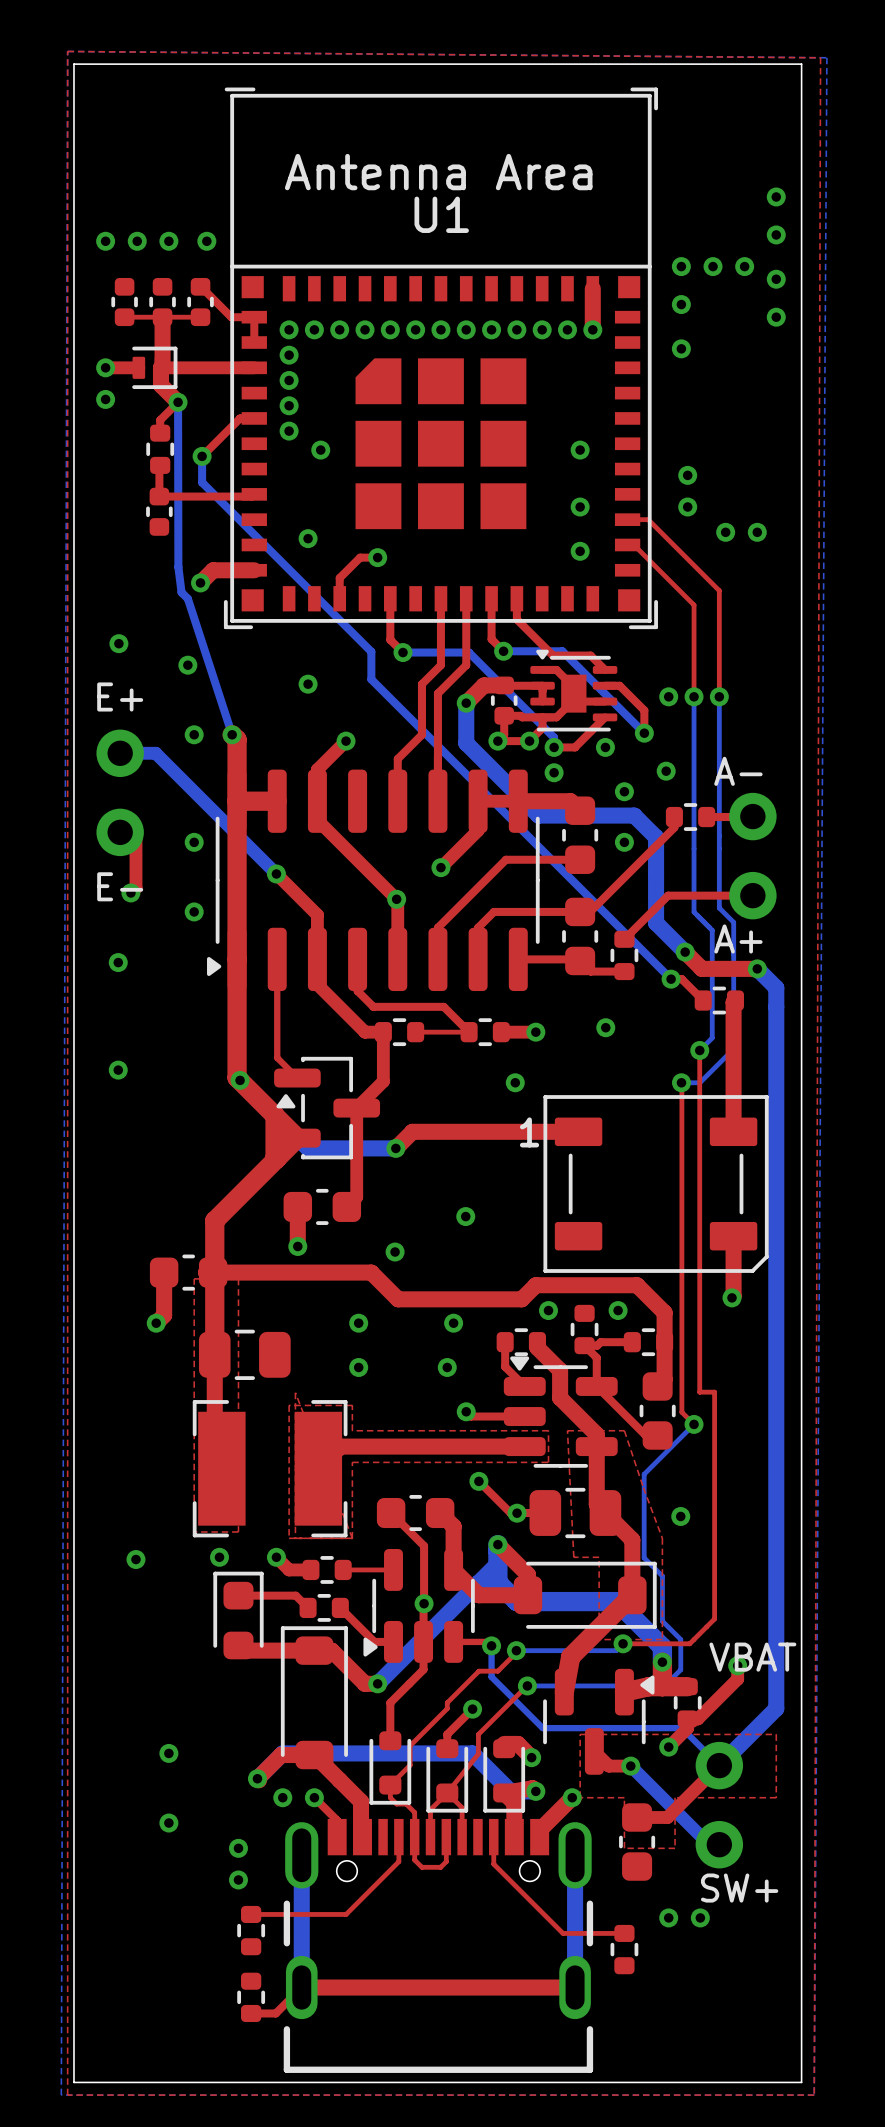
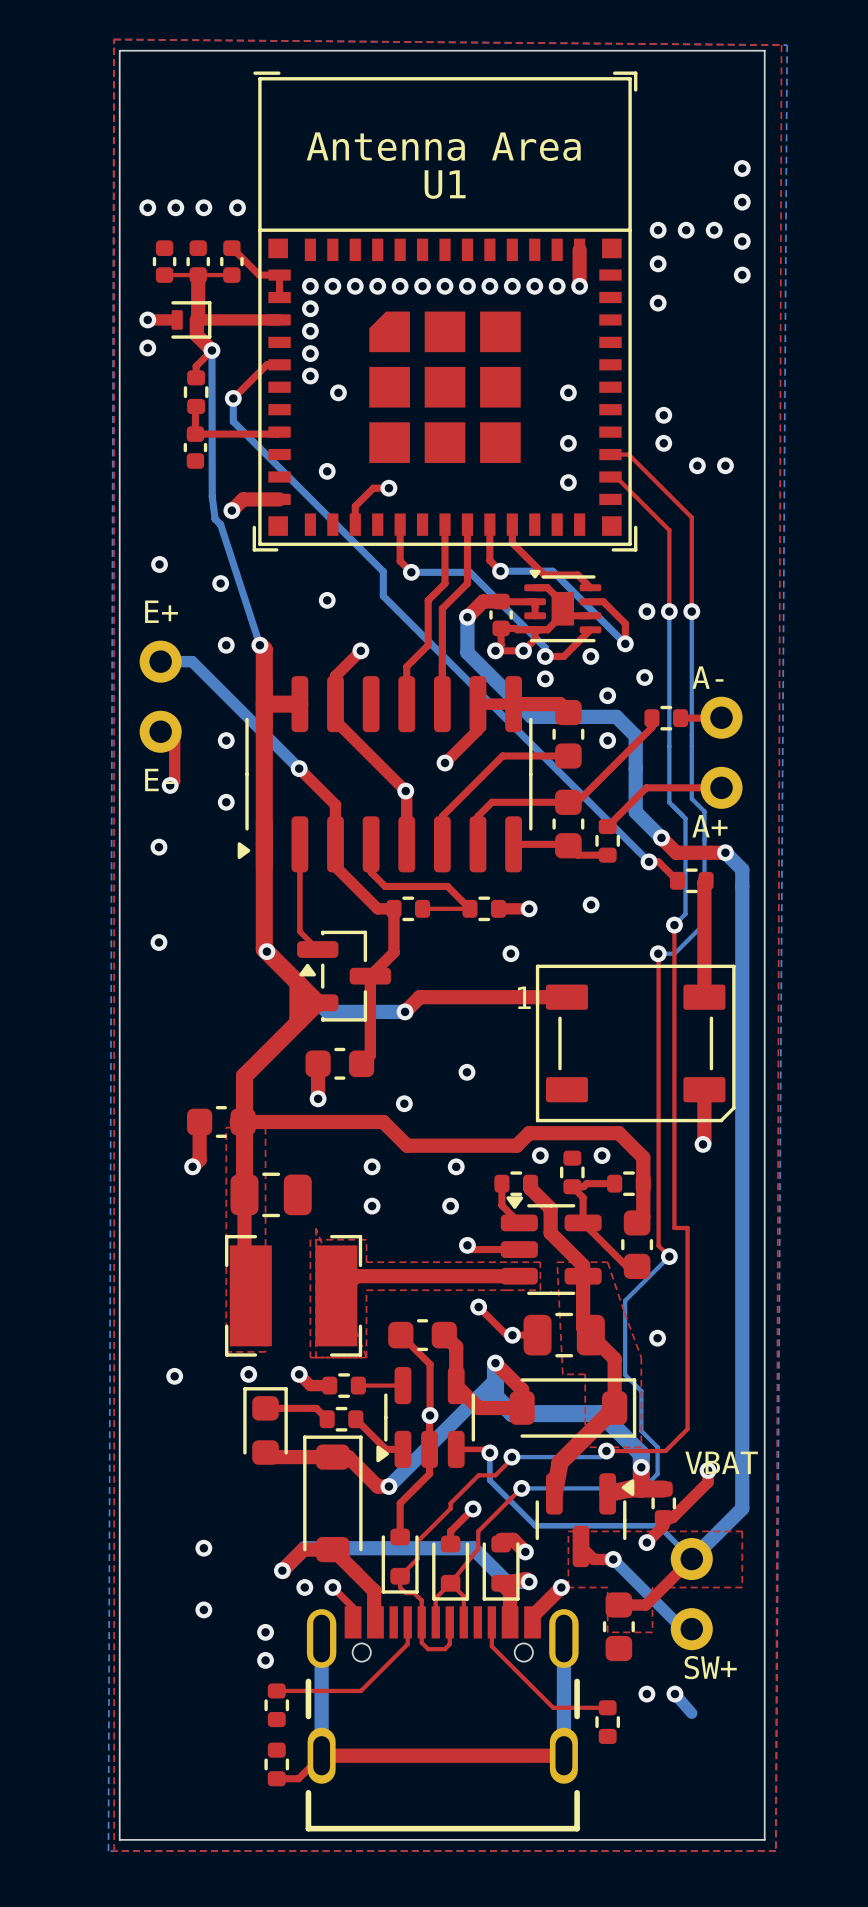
bottom track: none -> (674, 1694) (691, 1713)

